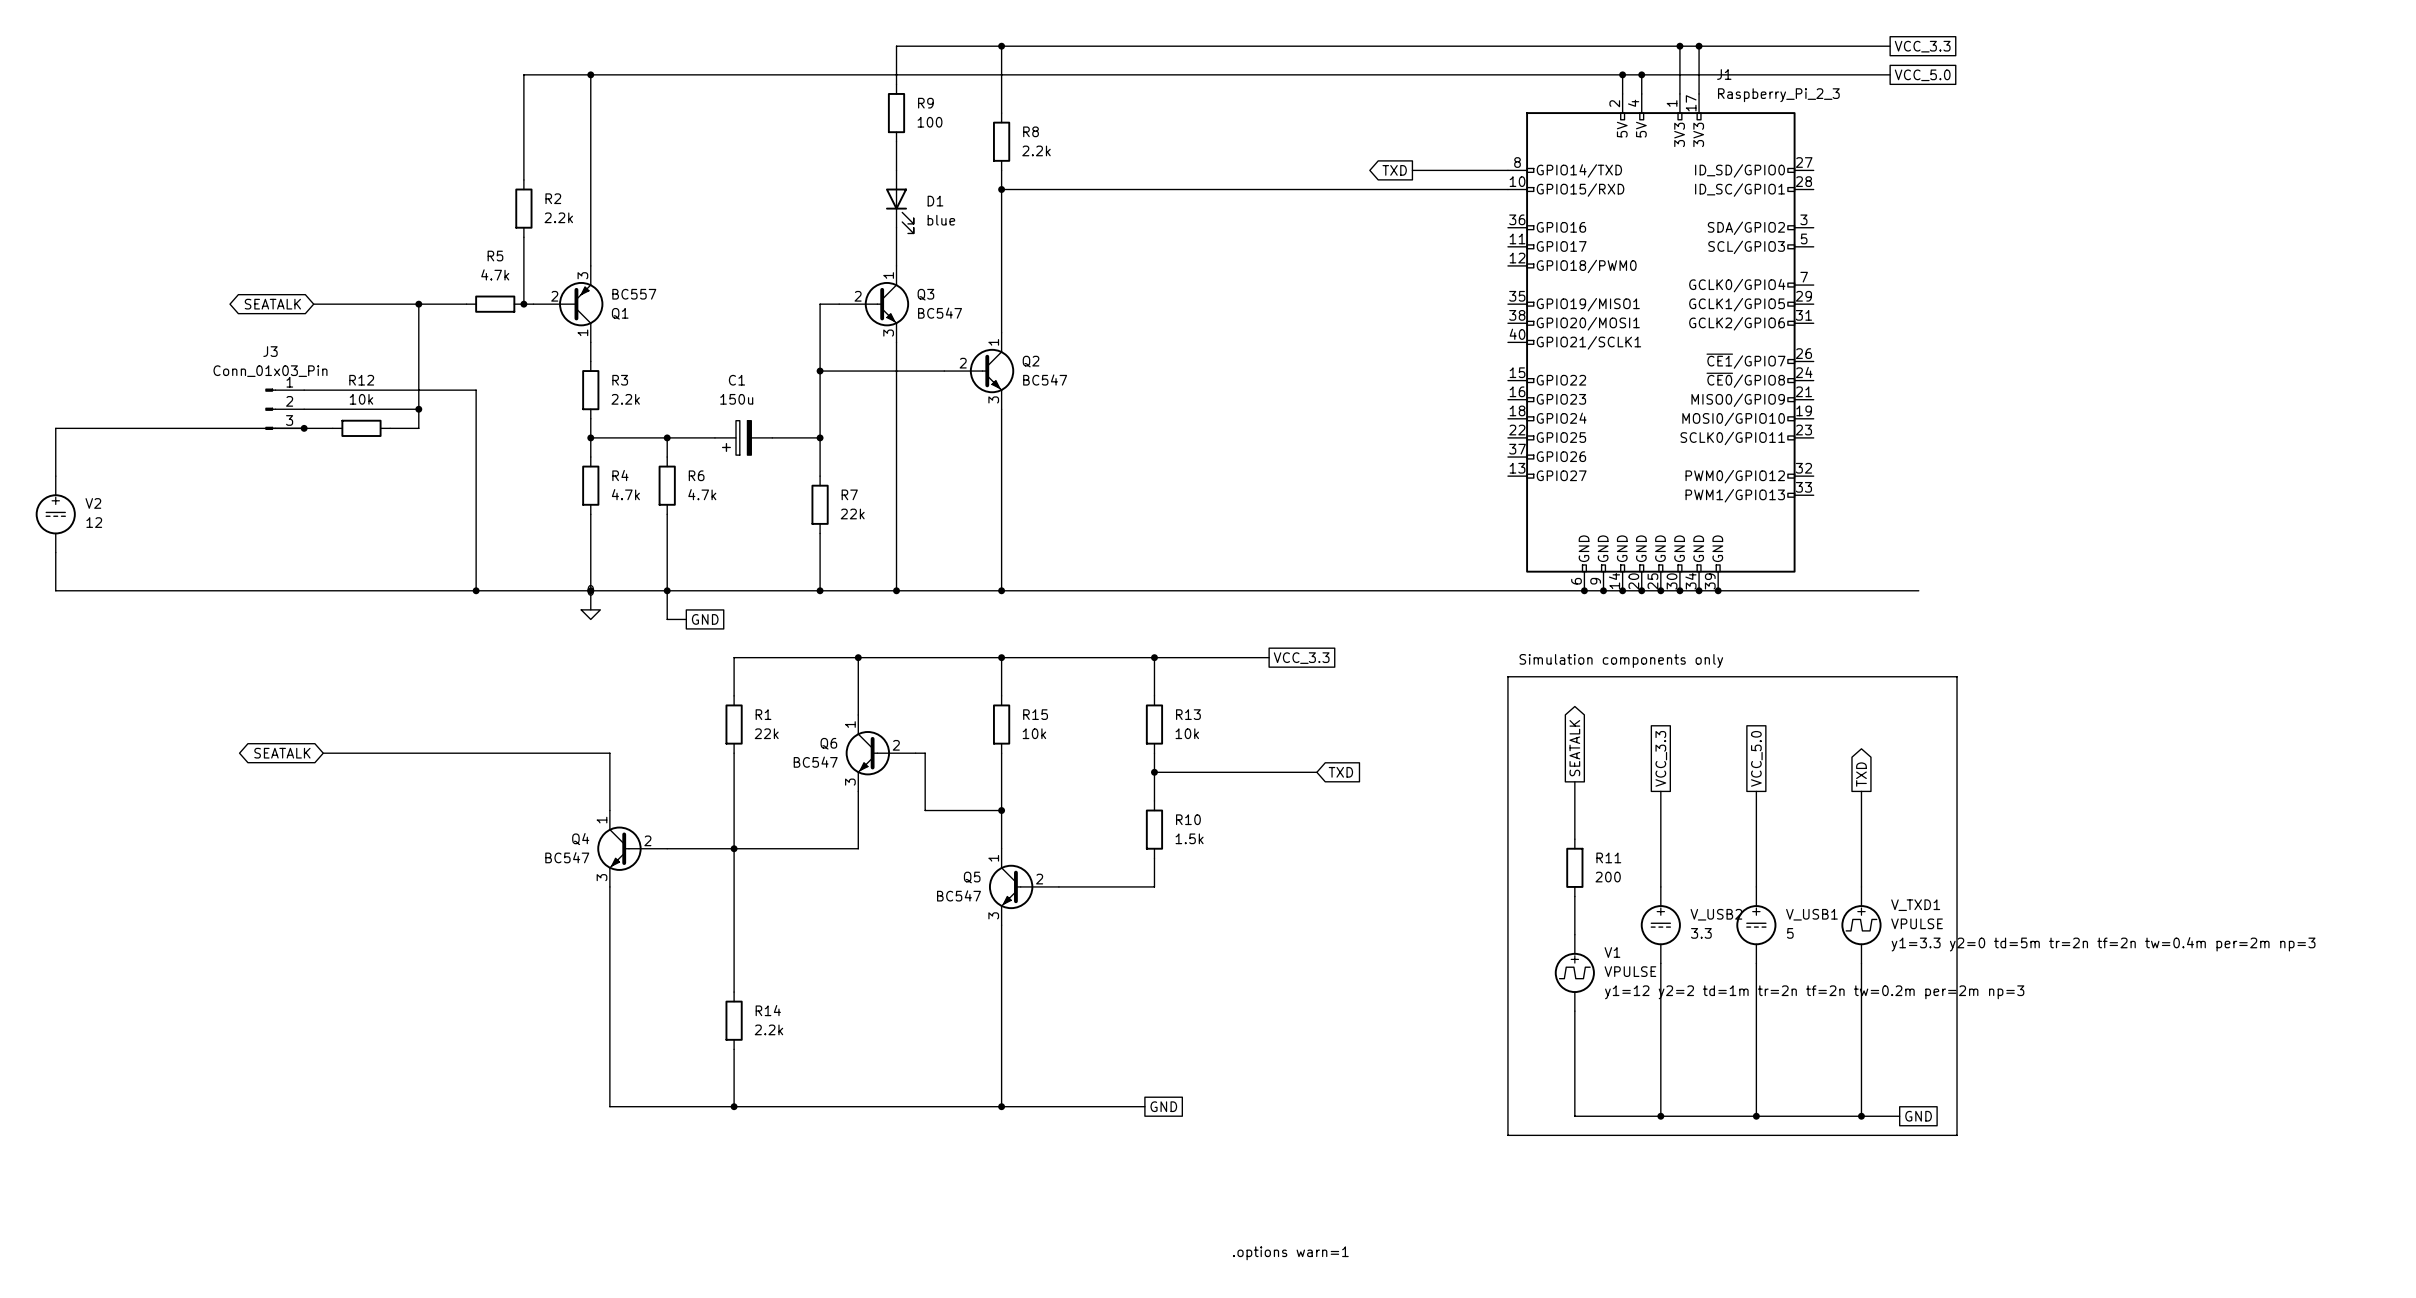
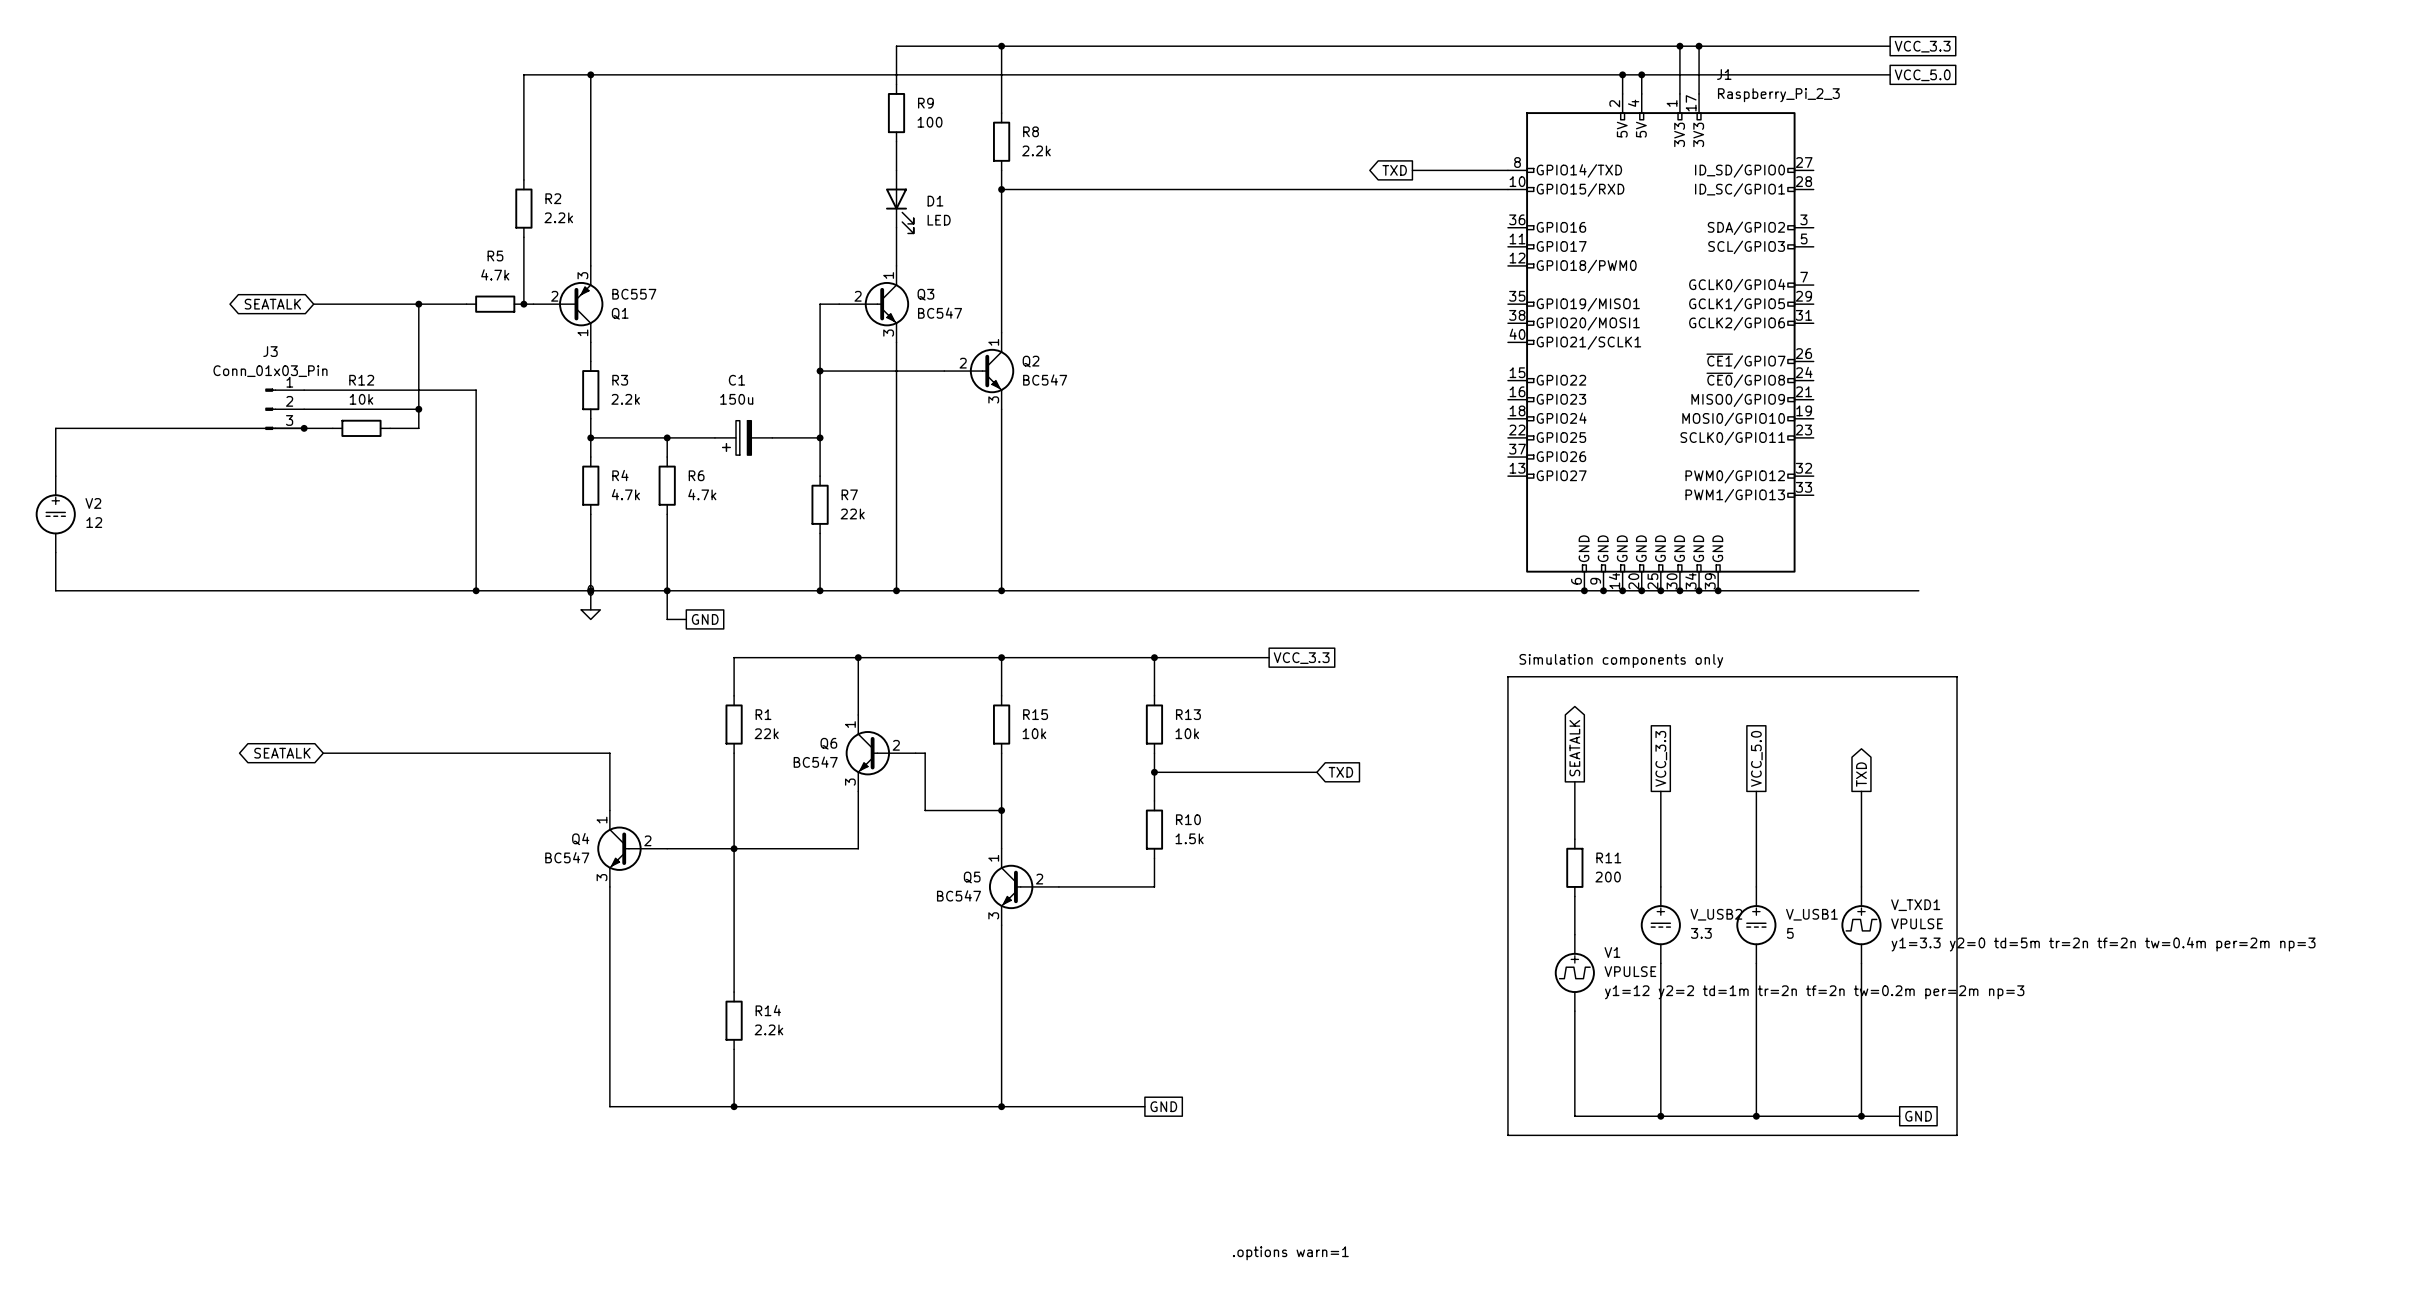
D1 value: blue (941, 220) -> LED (939, 220)

